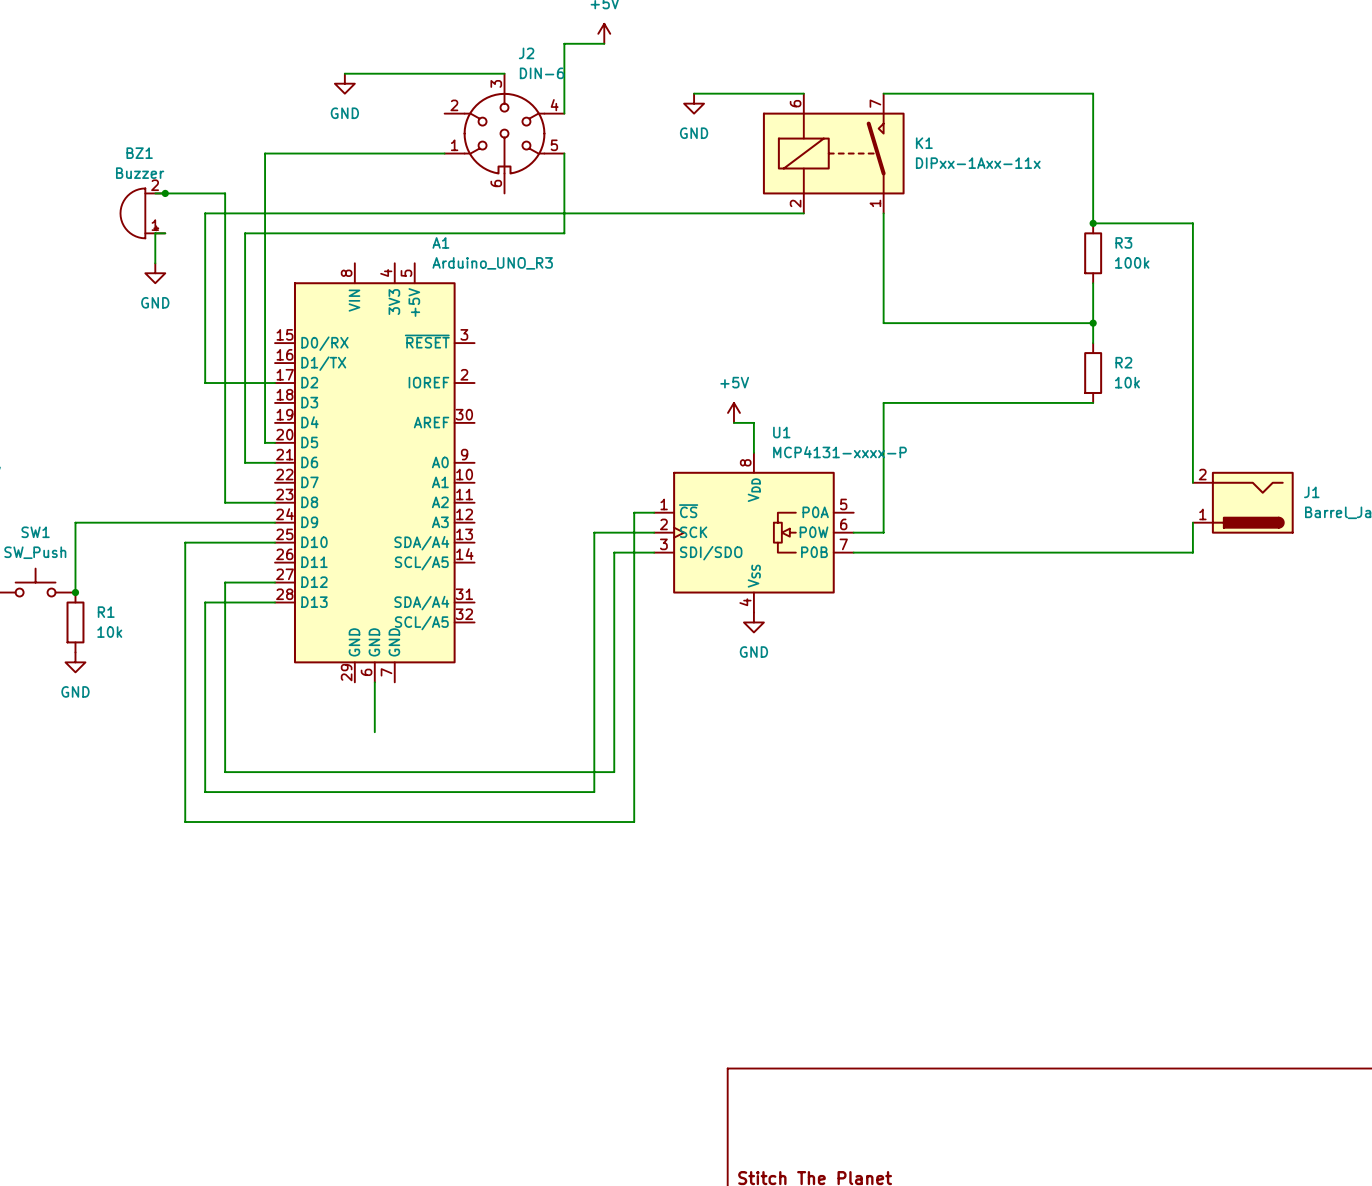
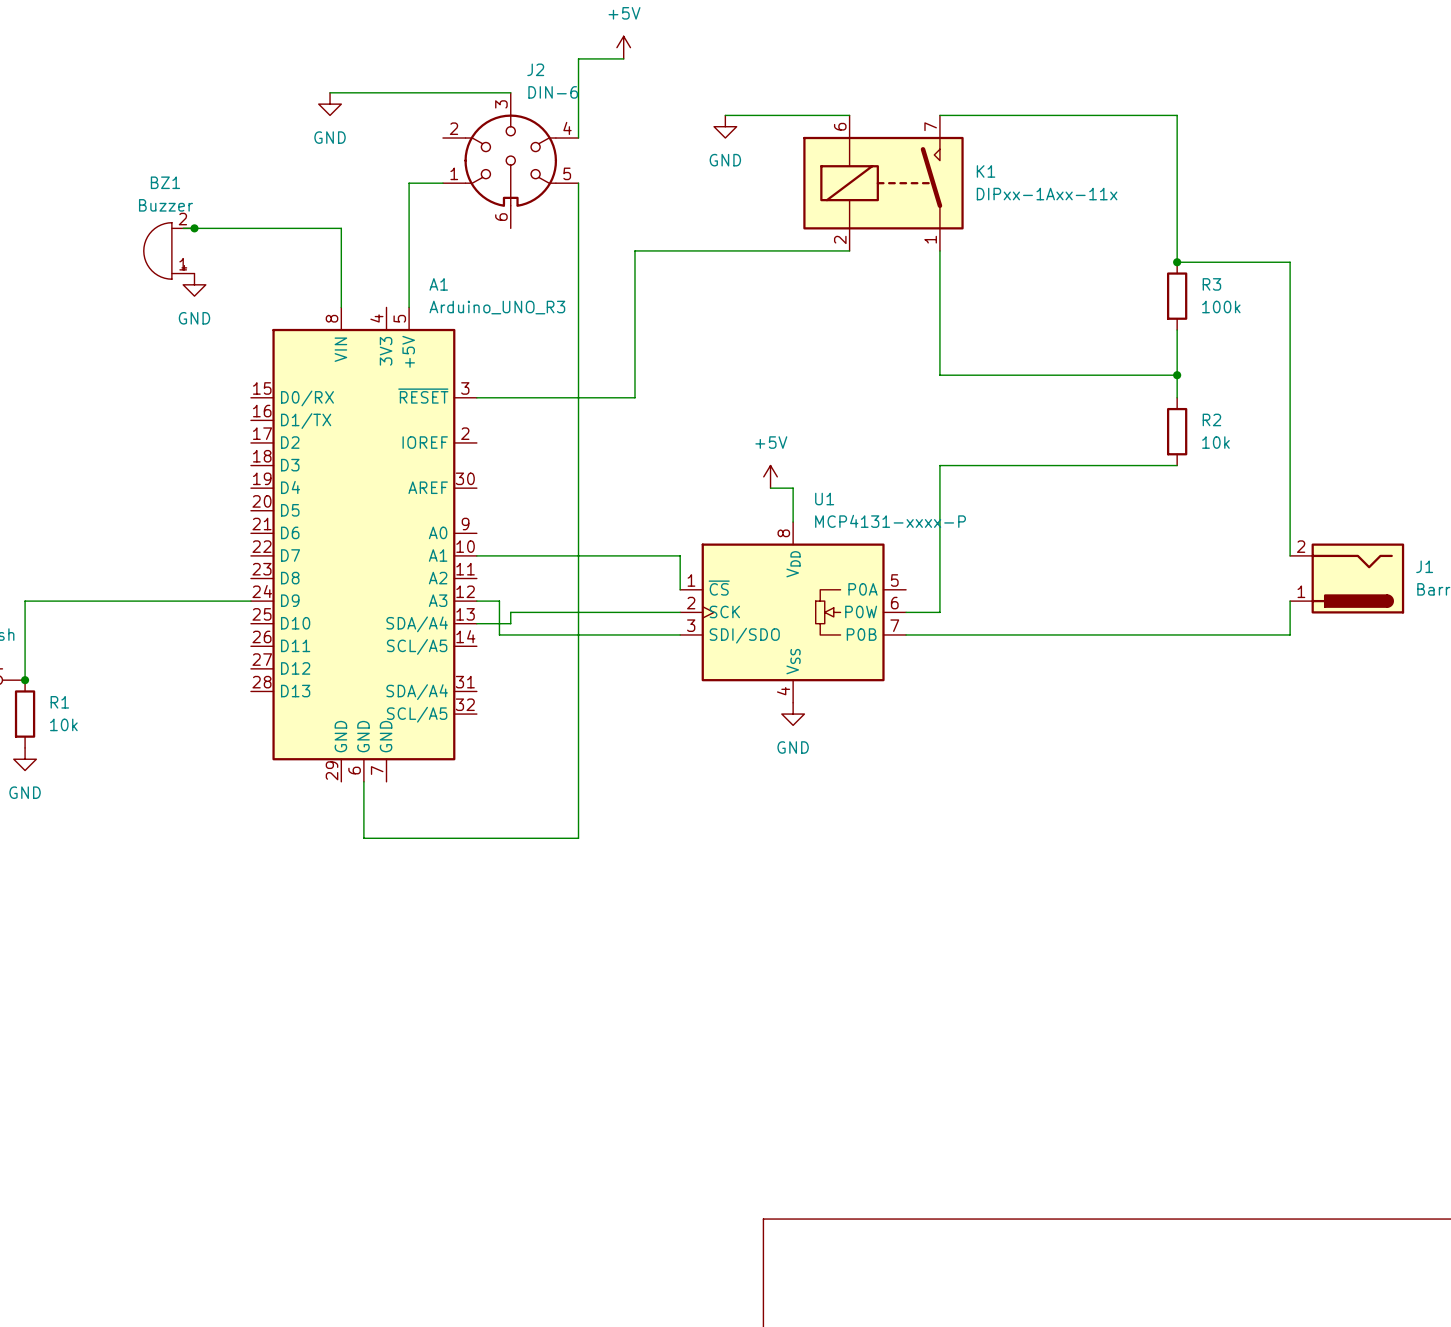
wire: (414, 153) (265, 153) (265, 442) (275, 442) -> (409, 183) (409, 307)
wire: (155, 193) (215, 193) -> none
junction: (165, 193) -> none
wire: (225, 193) (225, 502) (275, 502) -> (194, 228) (341, 228) (341, 307)
junction: none -> (194, 228)
BZ1 position: (142, 213) -> (169, 250)
wire: (614, 213) (205, 213) (205, 383) (275, 383) -> (634, 250) (634, 397) (476, 397)
wire: (165, 233) (155, 233) (155, 263) -> none
wire: (564, 233) (245, 233) (245, 462) (275, 462) -> (578, 273) (578, 838) (363, 838)
power symbol position: GND (155, 273) -> GND (194, 284)
wire: (654, 512) (634, 512) (634, 822) (185, 822) (185, 542) (275, 542) -> (680, 589) (680, 555) (476, 555)
wire: (594, 532) (594, 792) (205, 792) (205, 602) (275, 602) -> (612, 612) (510, 612) (510, 623) (476, 623)
wire: (614, 552) (614, 772) (225, 772) (225, 582) (275, 582) -> (634, 634) (499, 634) (499, 601) (476, 601)

